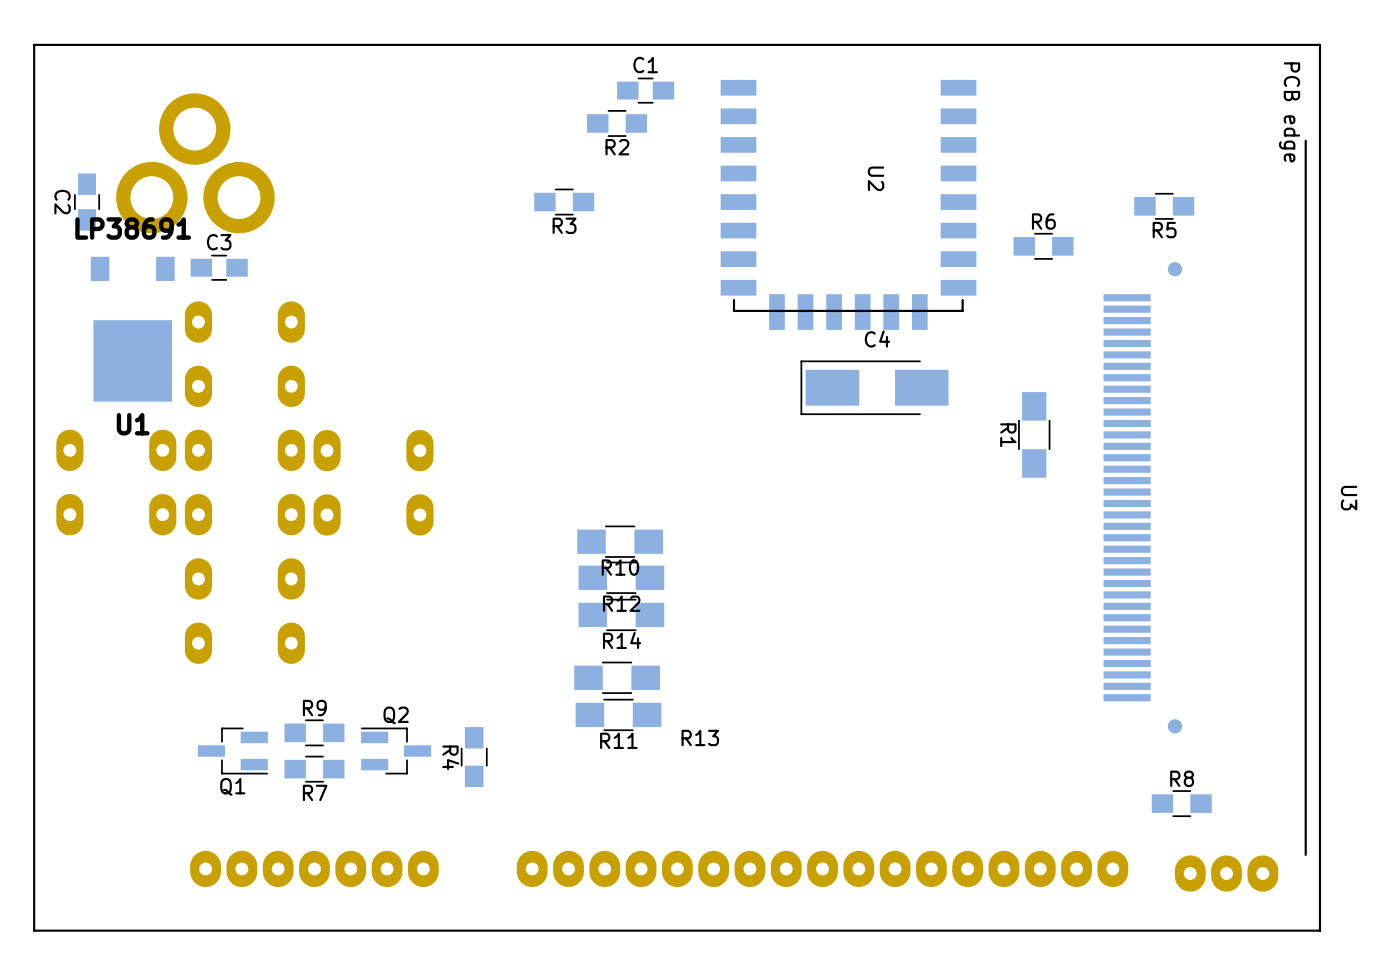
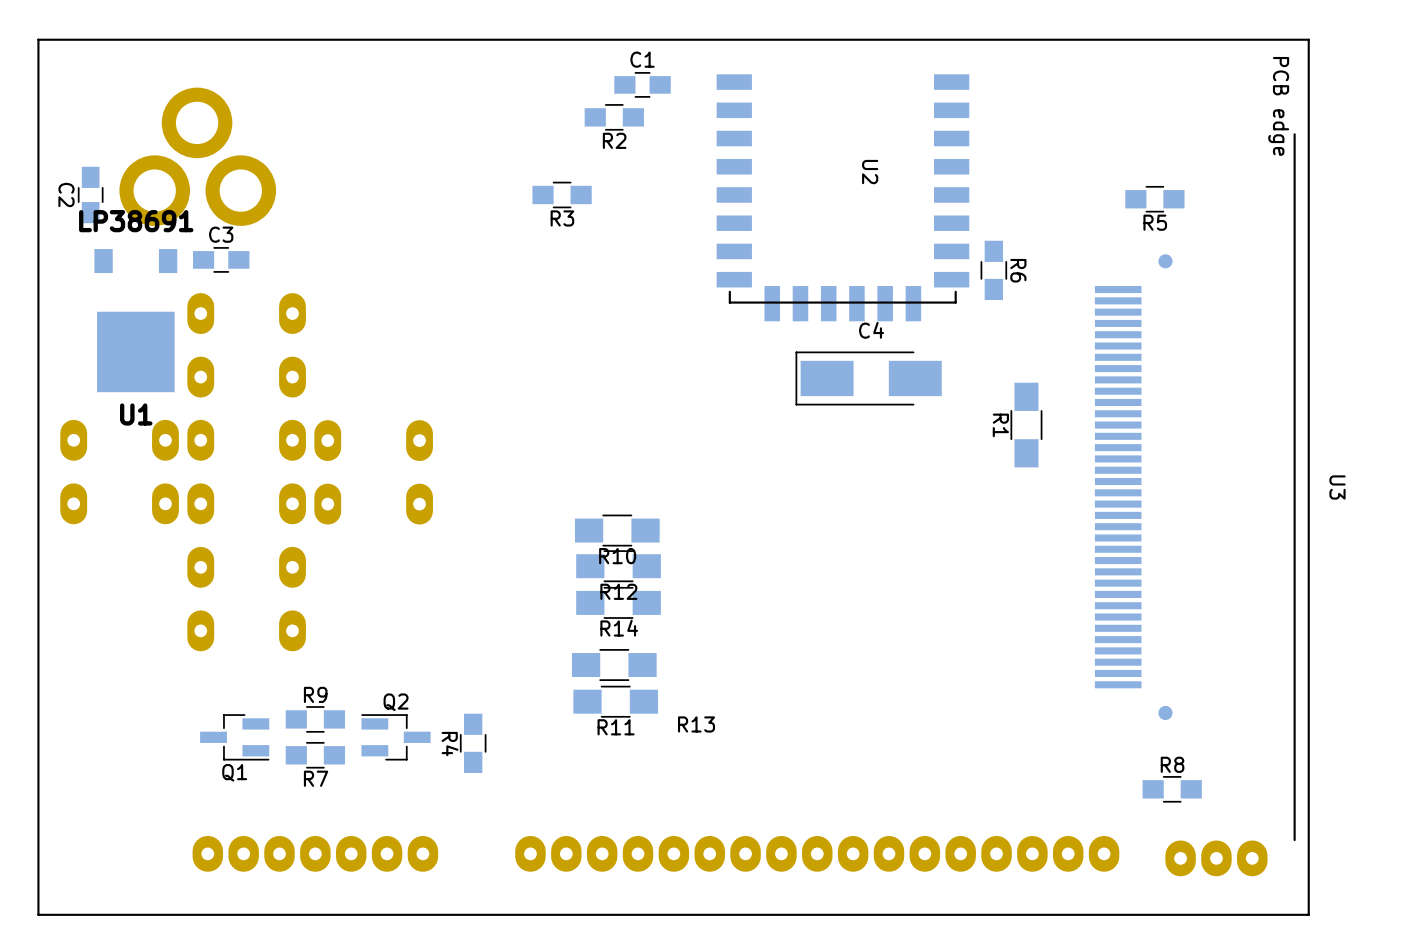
R6 rotation: 0° (1043, 246) -> 90° clockwise (993, 270)
R6 position: (1043, 246) -> (993, 270)

